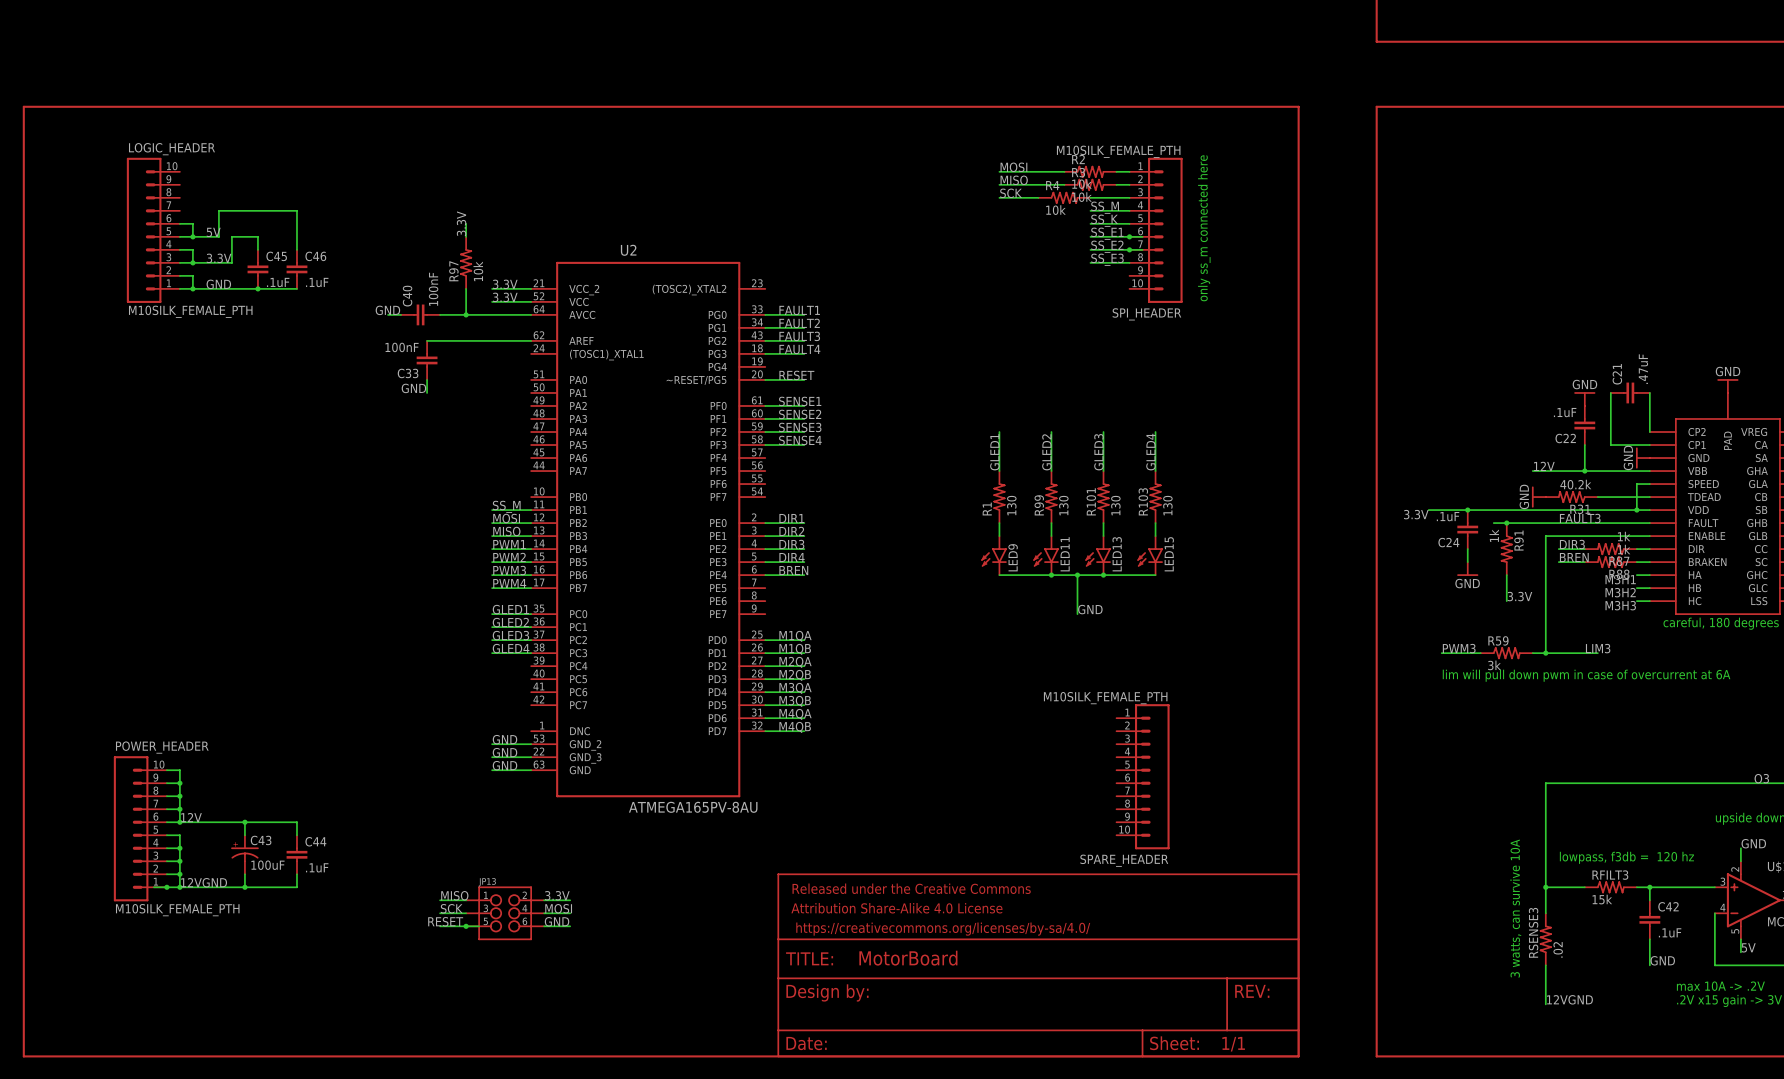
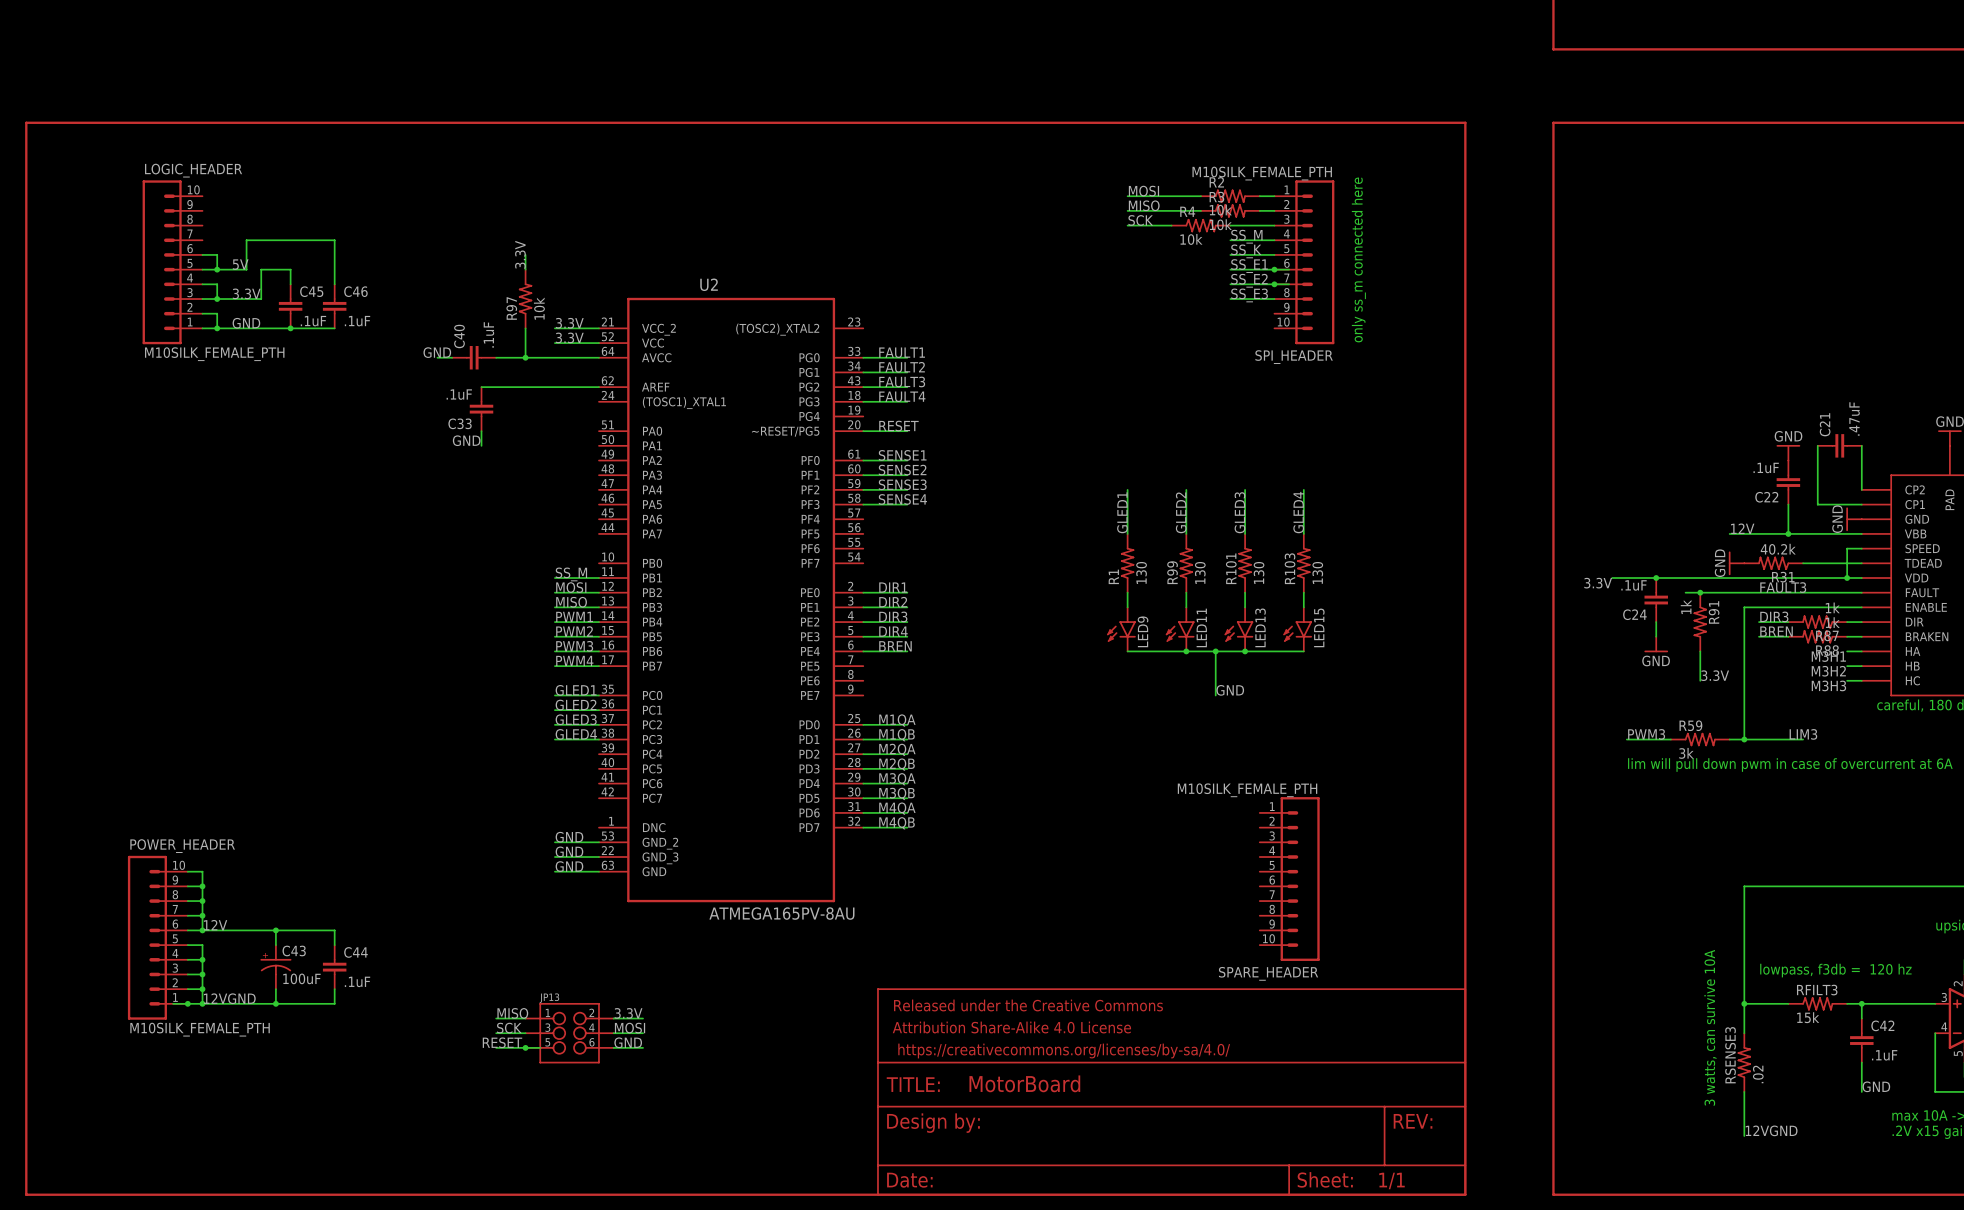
C40 value: 100nF (433, 289) -> .1uF (488, 334)
C33 value: 100nF (402, 347) -> .1uF (459, 394)

